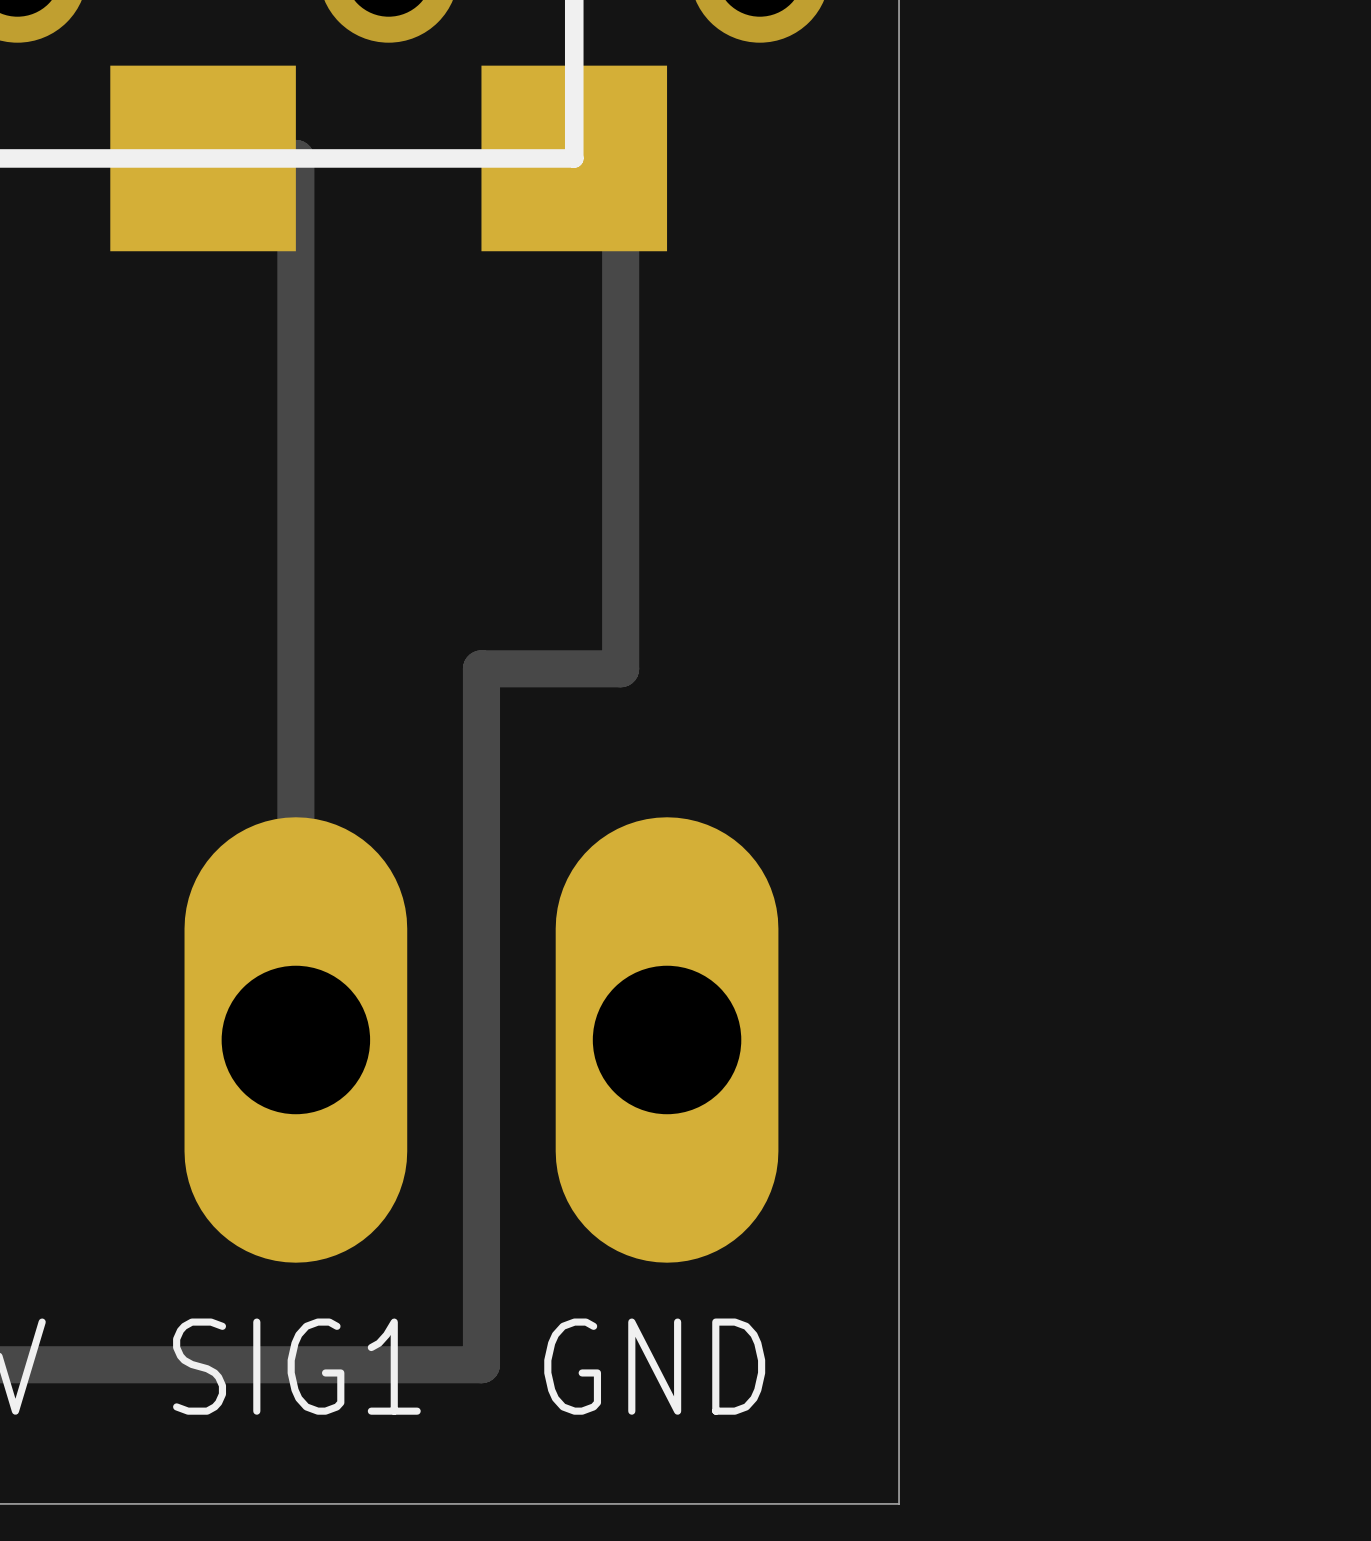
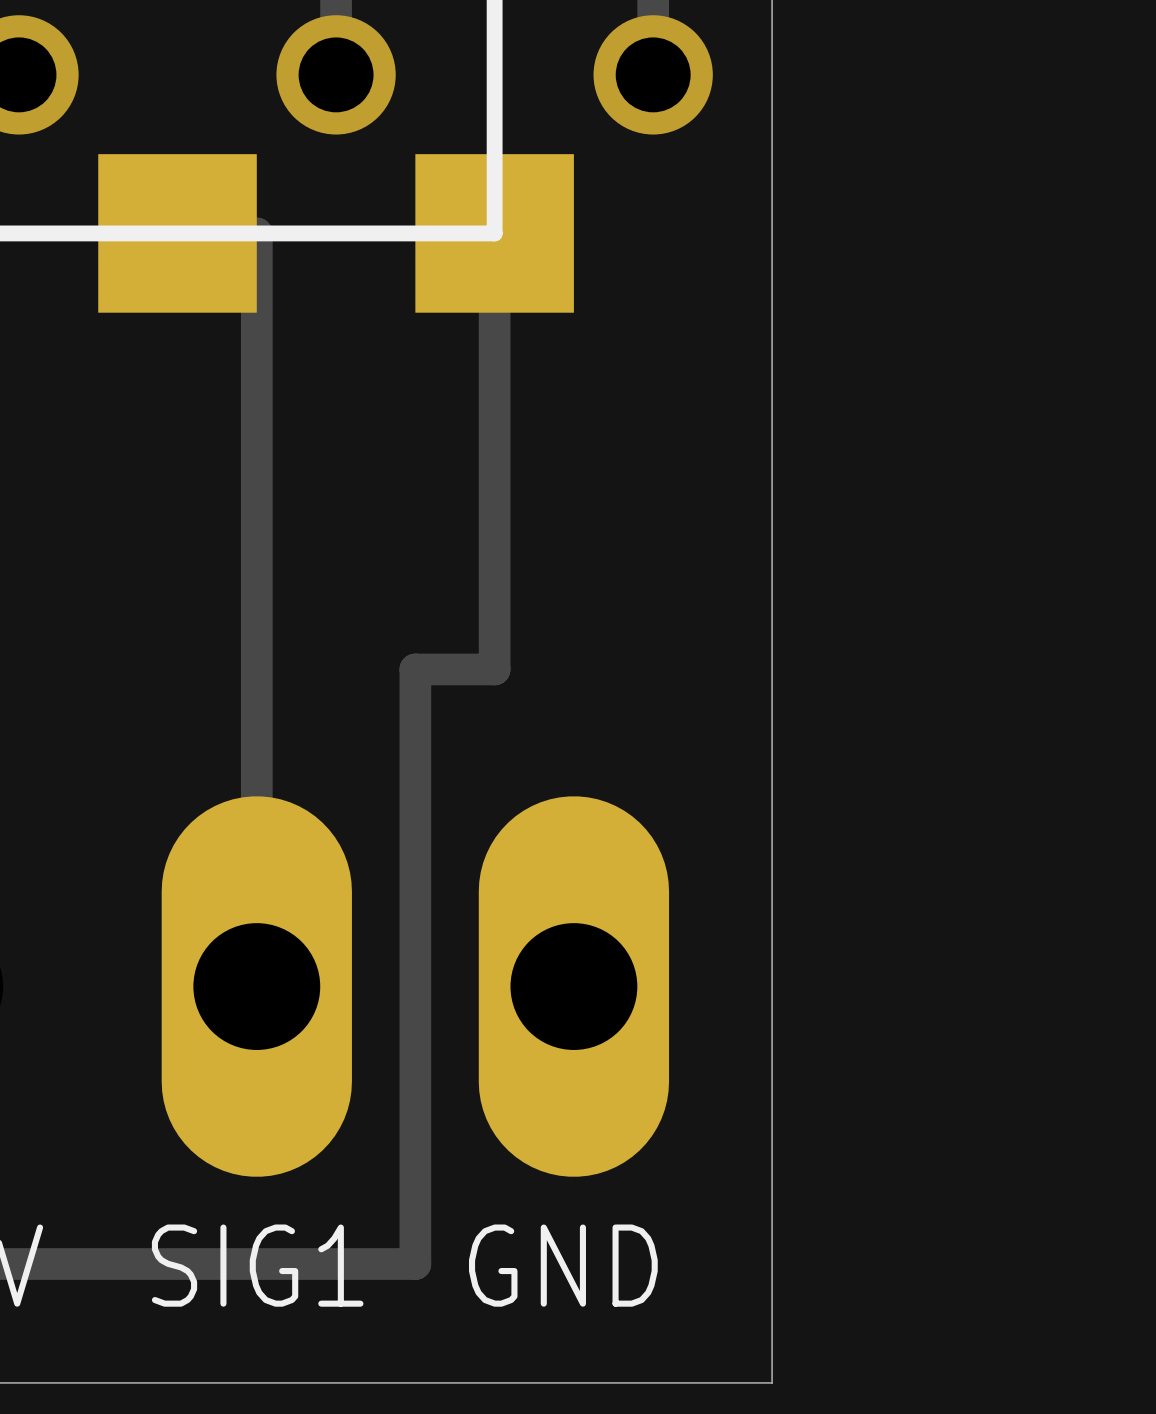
track: (574, 158) (620, 158) (620, 668) (574, 668) -> (494, 233) (494, 669)

